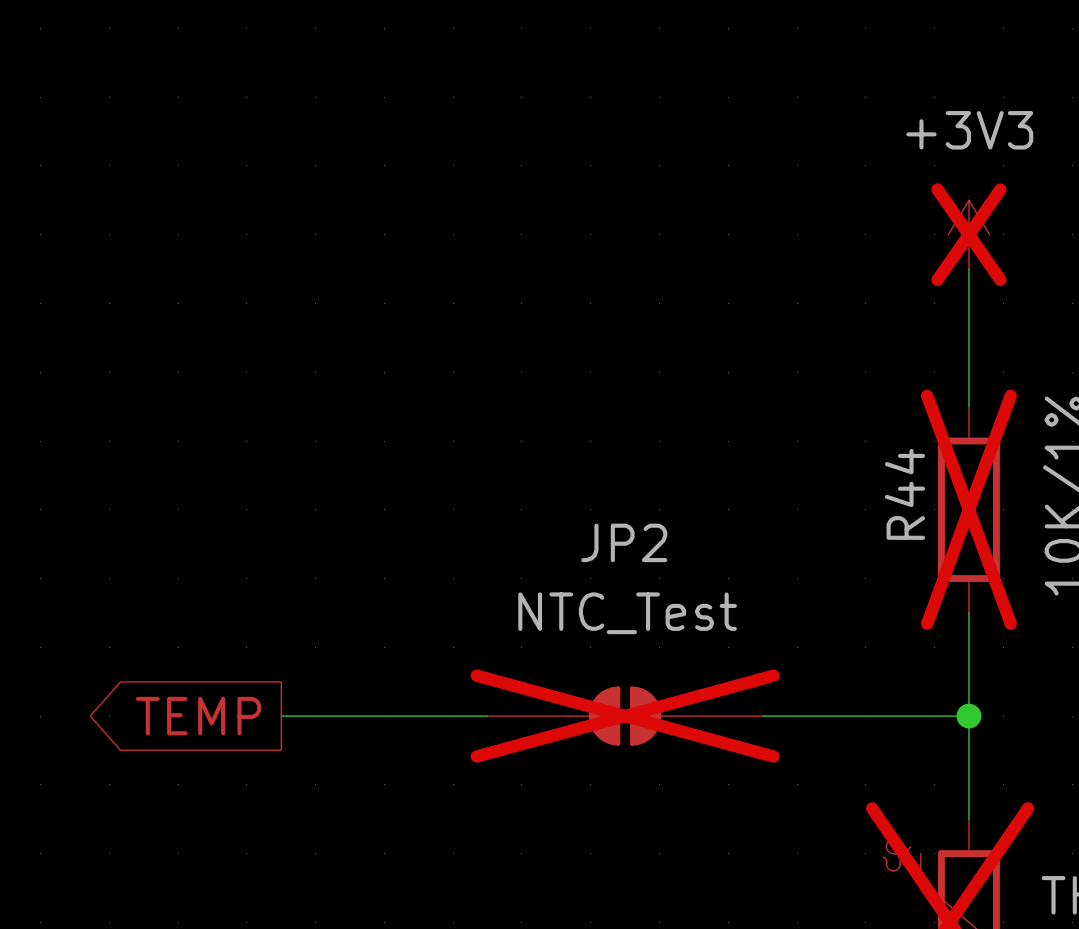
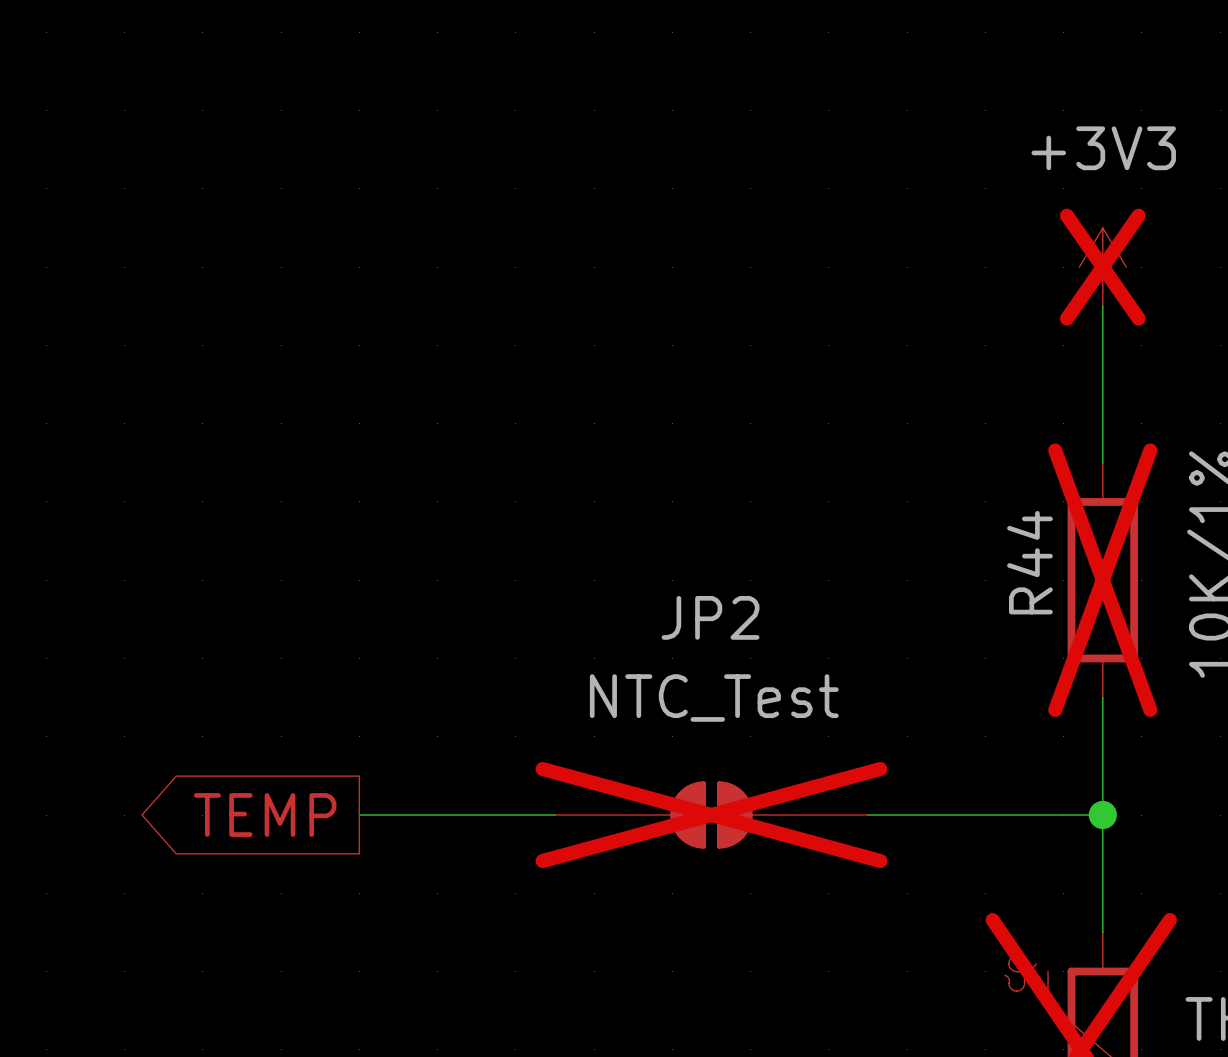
global label position: TEMP (198, 716) -> TEMP (265, 815)
wire: (281, 716) (315, 716) -> none

